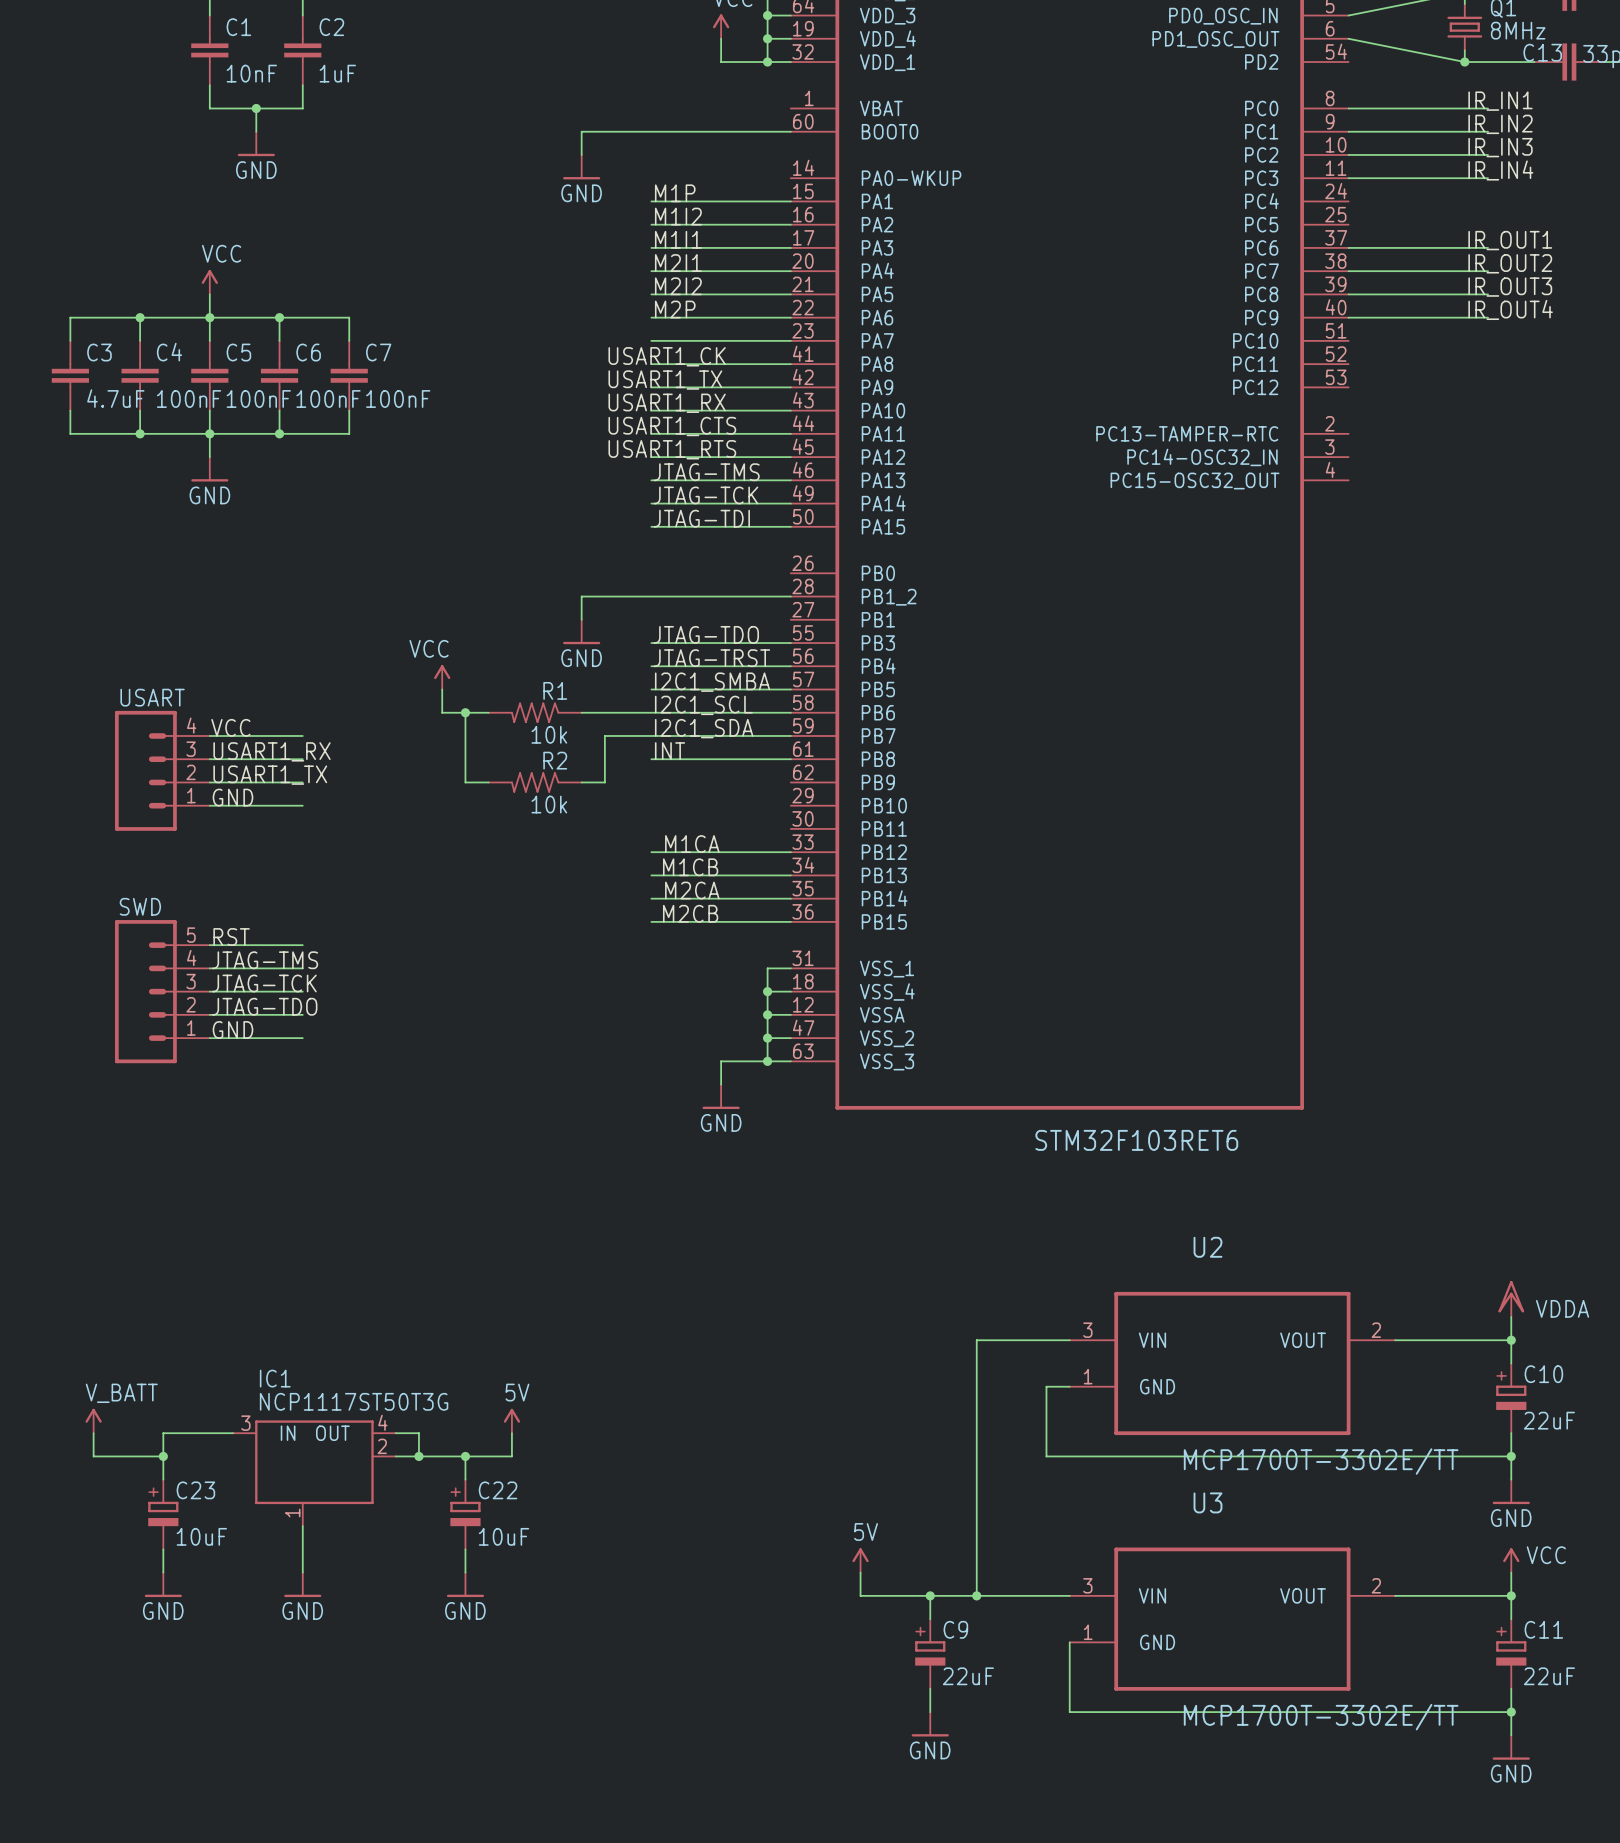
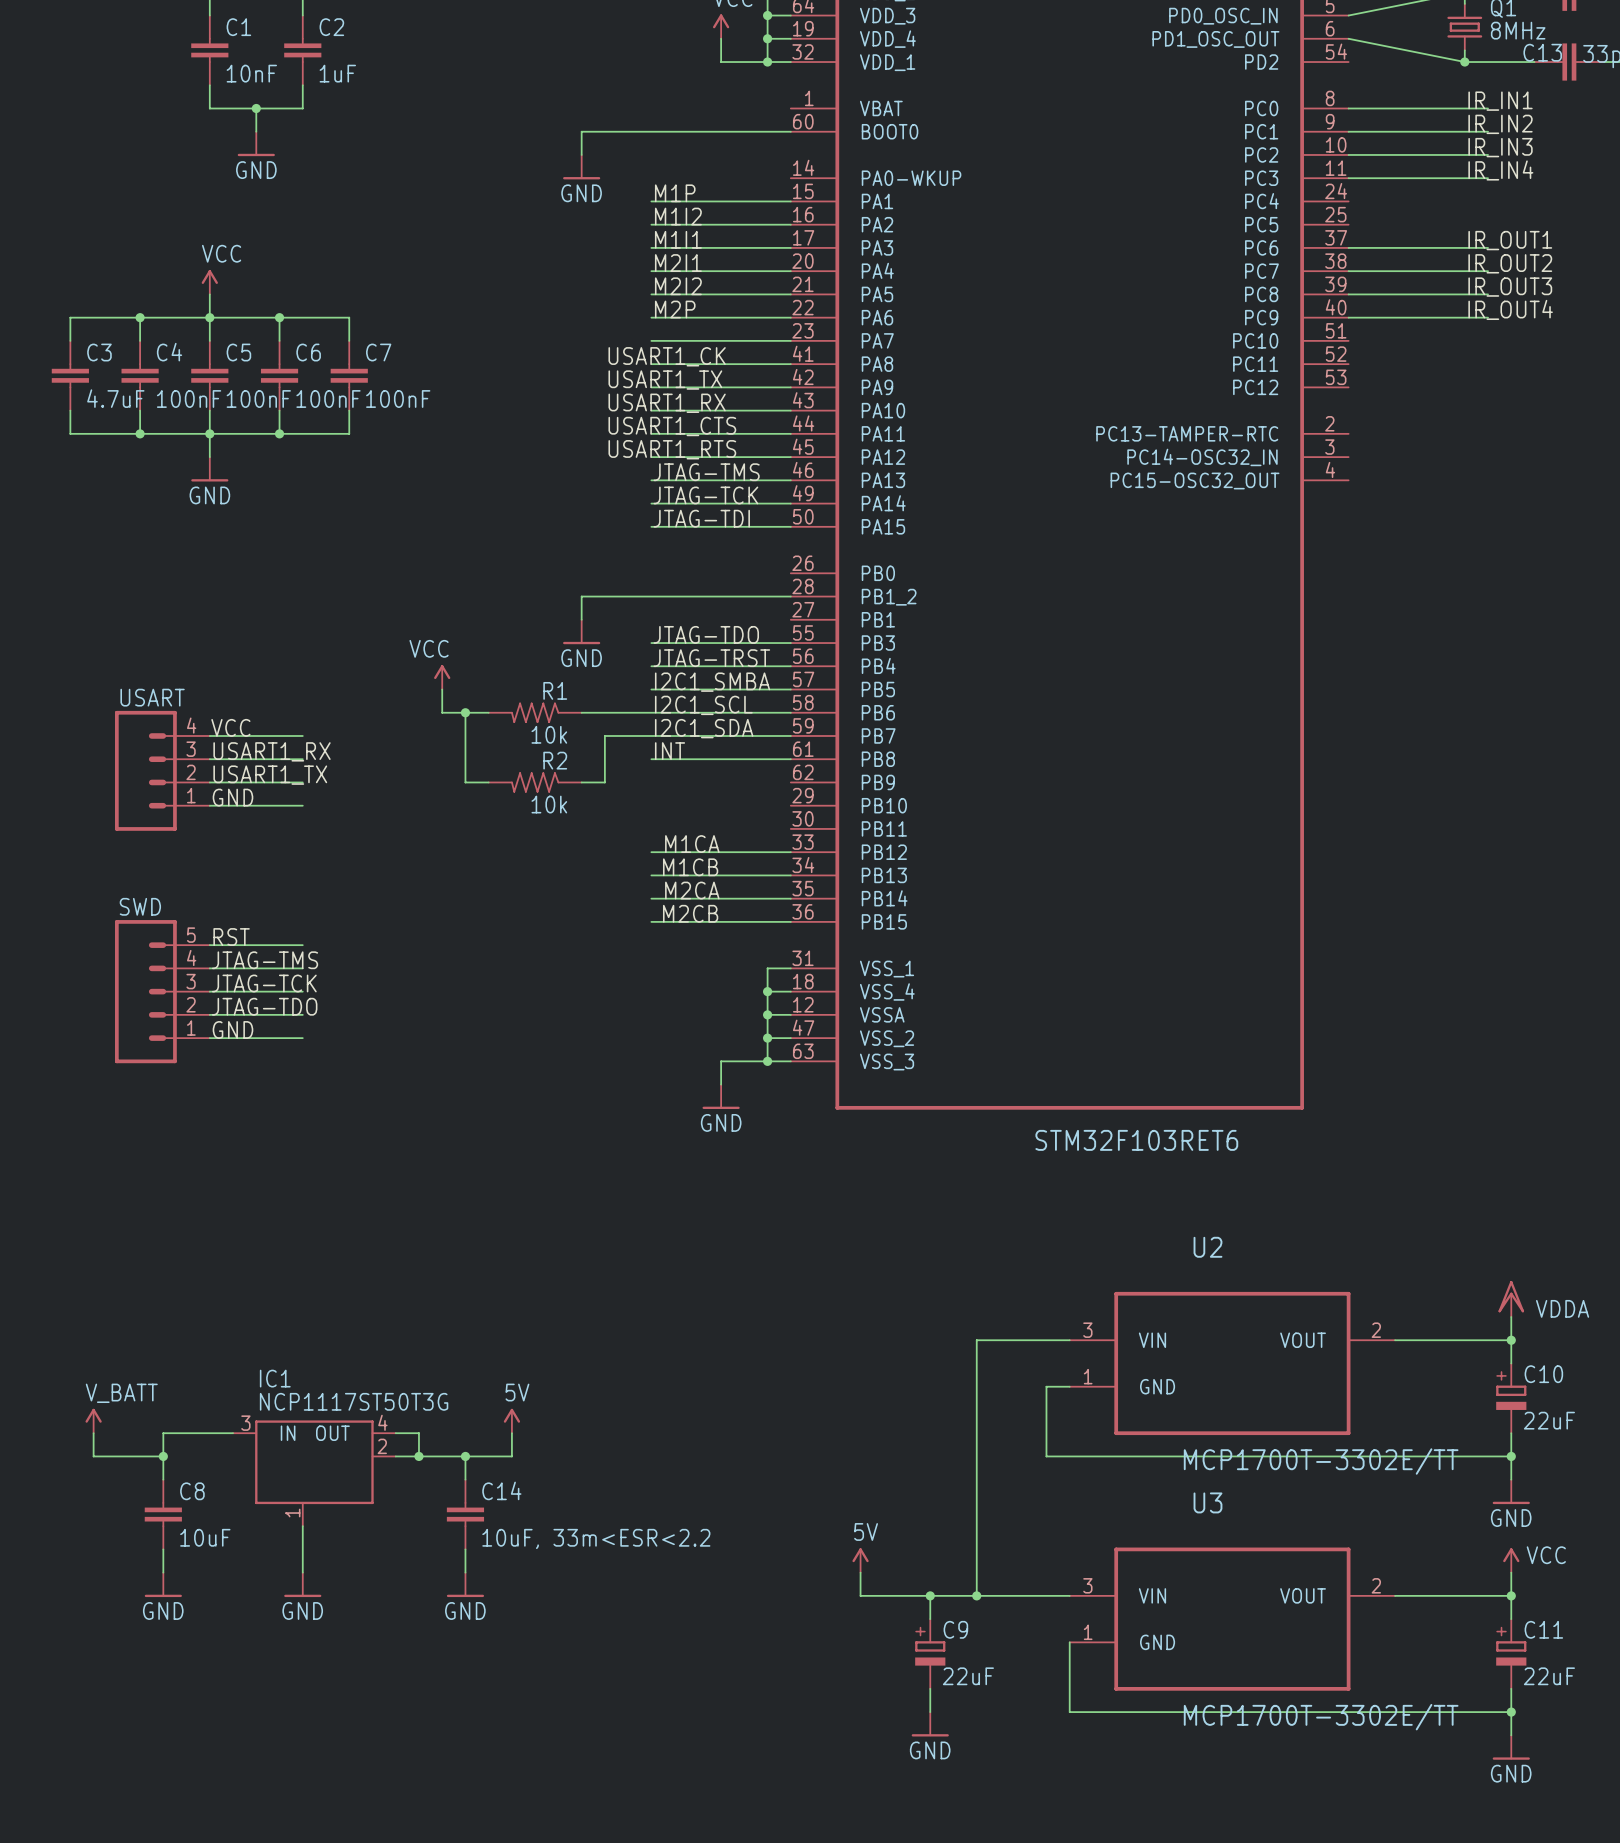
C23: 10uF (163, 1514) -> none
C8: none -> 10uF (163, 1514)
C22: 10uF (465, 1514) -> none
C14: none -> 10uF, 33m<ESR<2.2 (465, 1514)

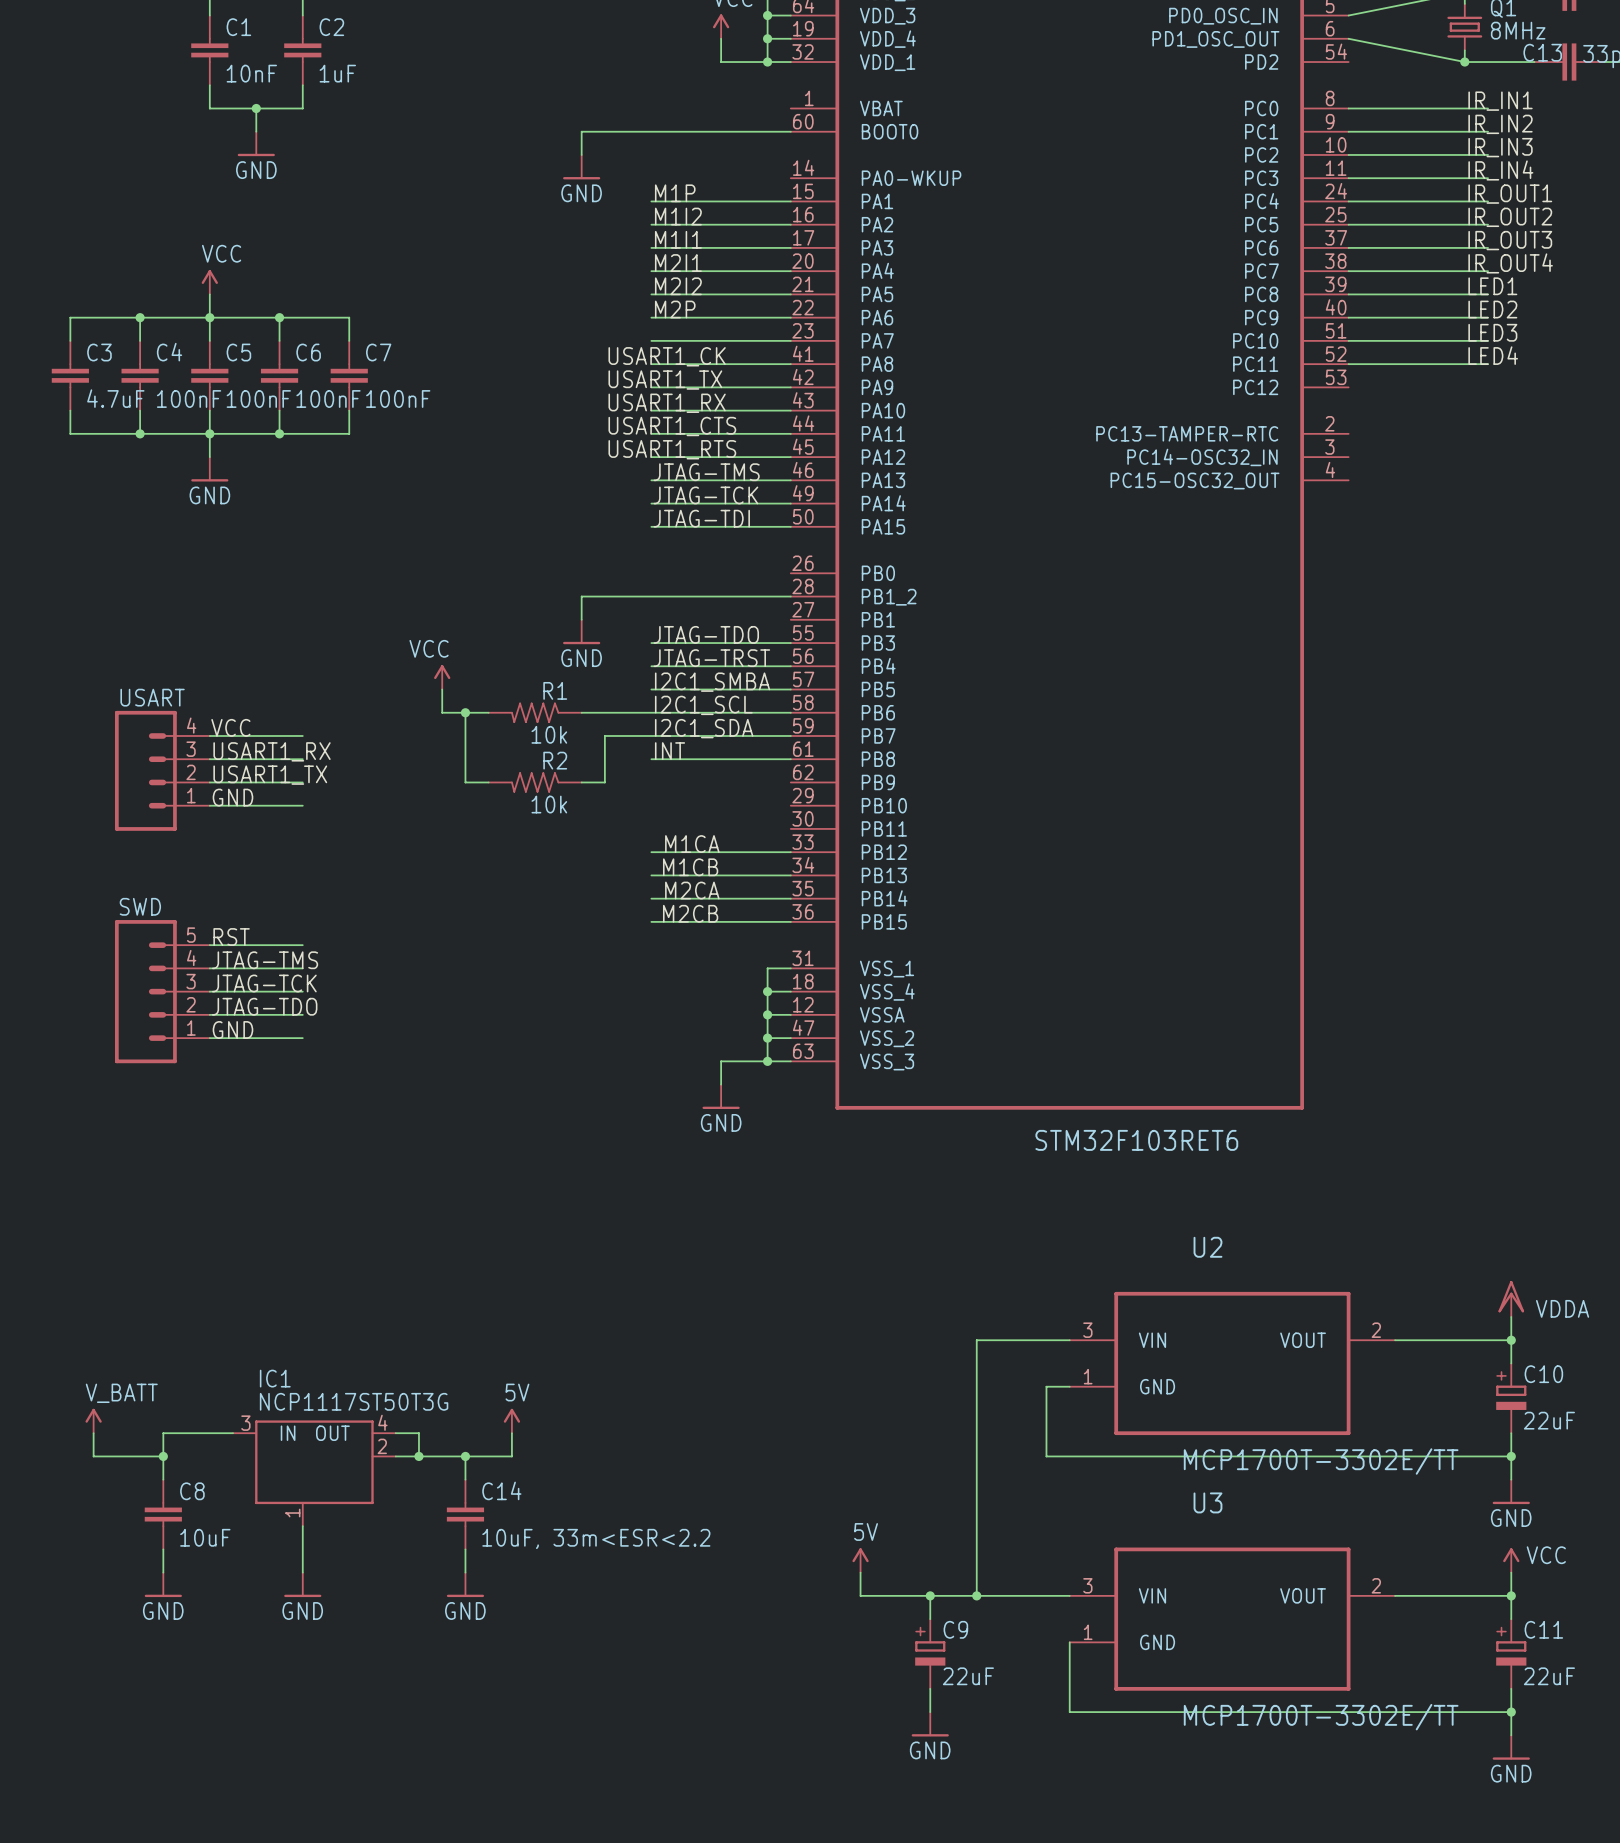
label: none -> IR_OUT1 (1510, 194)
wire: none -> (1348, 201) (1488, 201)
label: none -> IR_OUT2 (1510, 217)
wire: none -> (1348, 224) (1488, 224)
label: IR_OUT1 (1510, 240) -> IR_OUT3 (1510, 240)
label: IR_OUT2 (1510, 263) -> IR_OUT4 (1510, 263)
label: IR_OUT3 (1510, 287) -> LED1 (1492, 286)
label: IR_OUT4 (1510, 309) -> LED2 (1492, 309)
label: none -> LED3 (1492, 332)
wire: none -> (1348, 340) (1488, 340)
label: none -> LED4 (1493, 355)
wire: none -> (1348, 364) (1488, 364)

